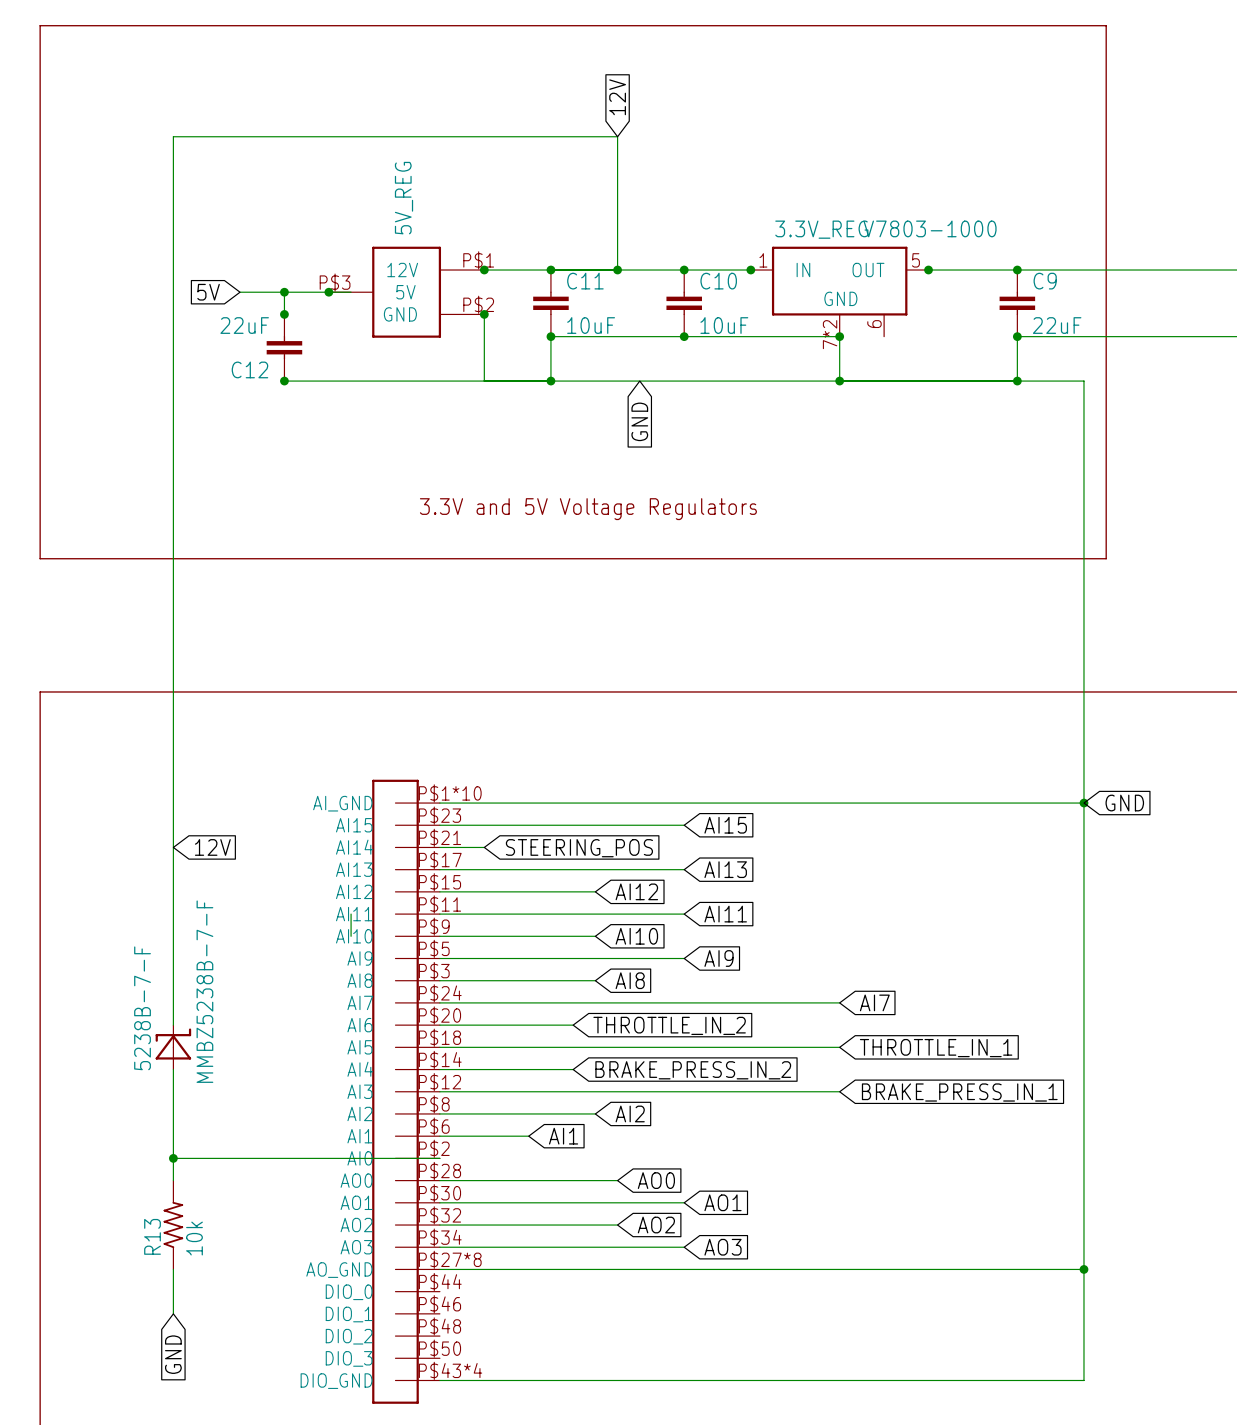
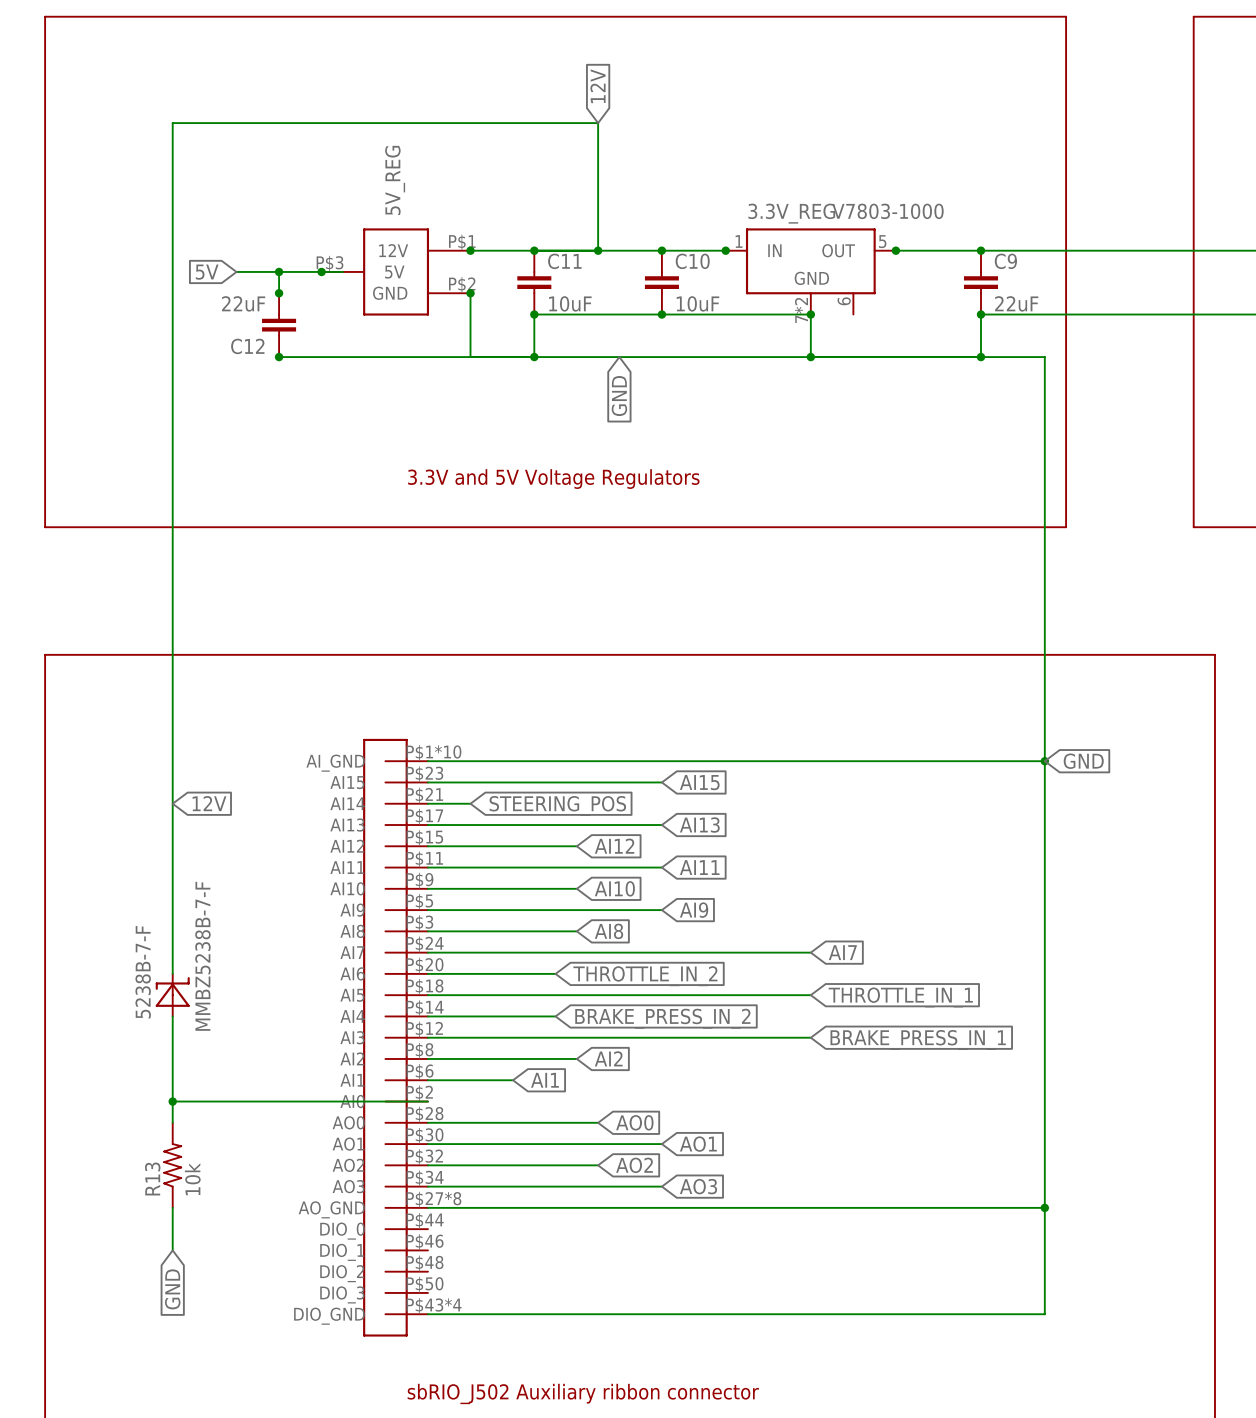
wire: (351, 914) (351, 936) -> none

